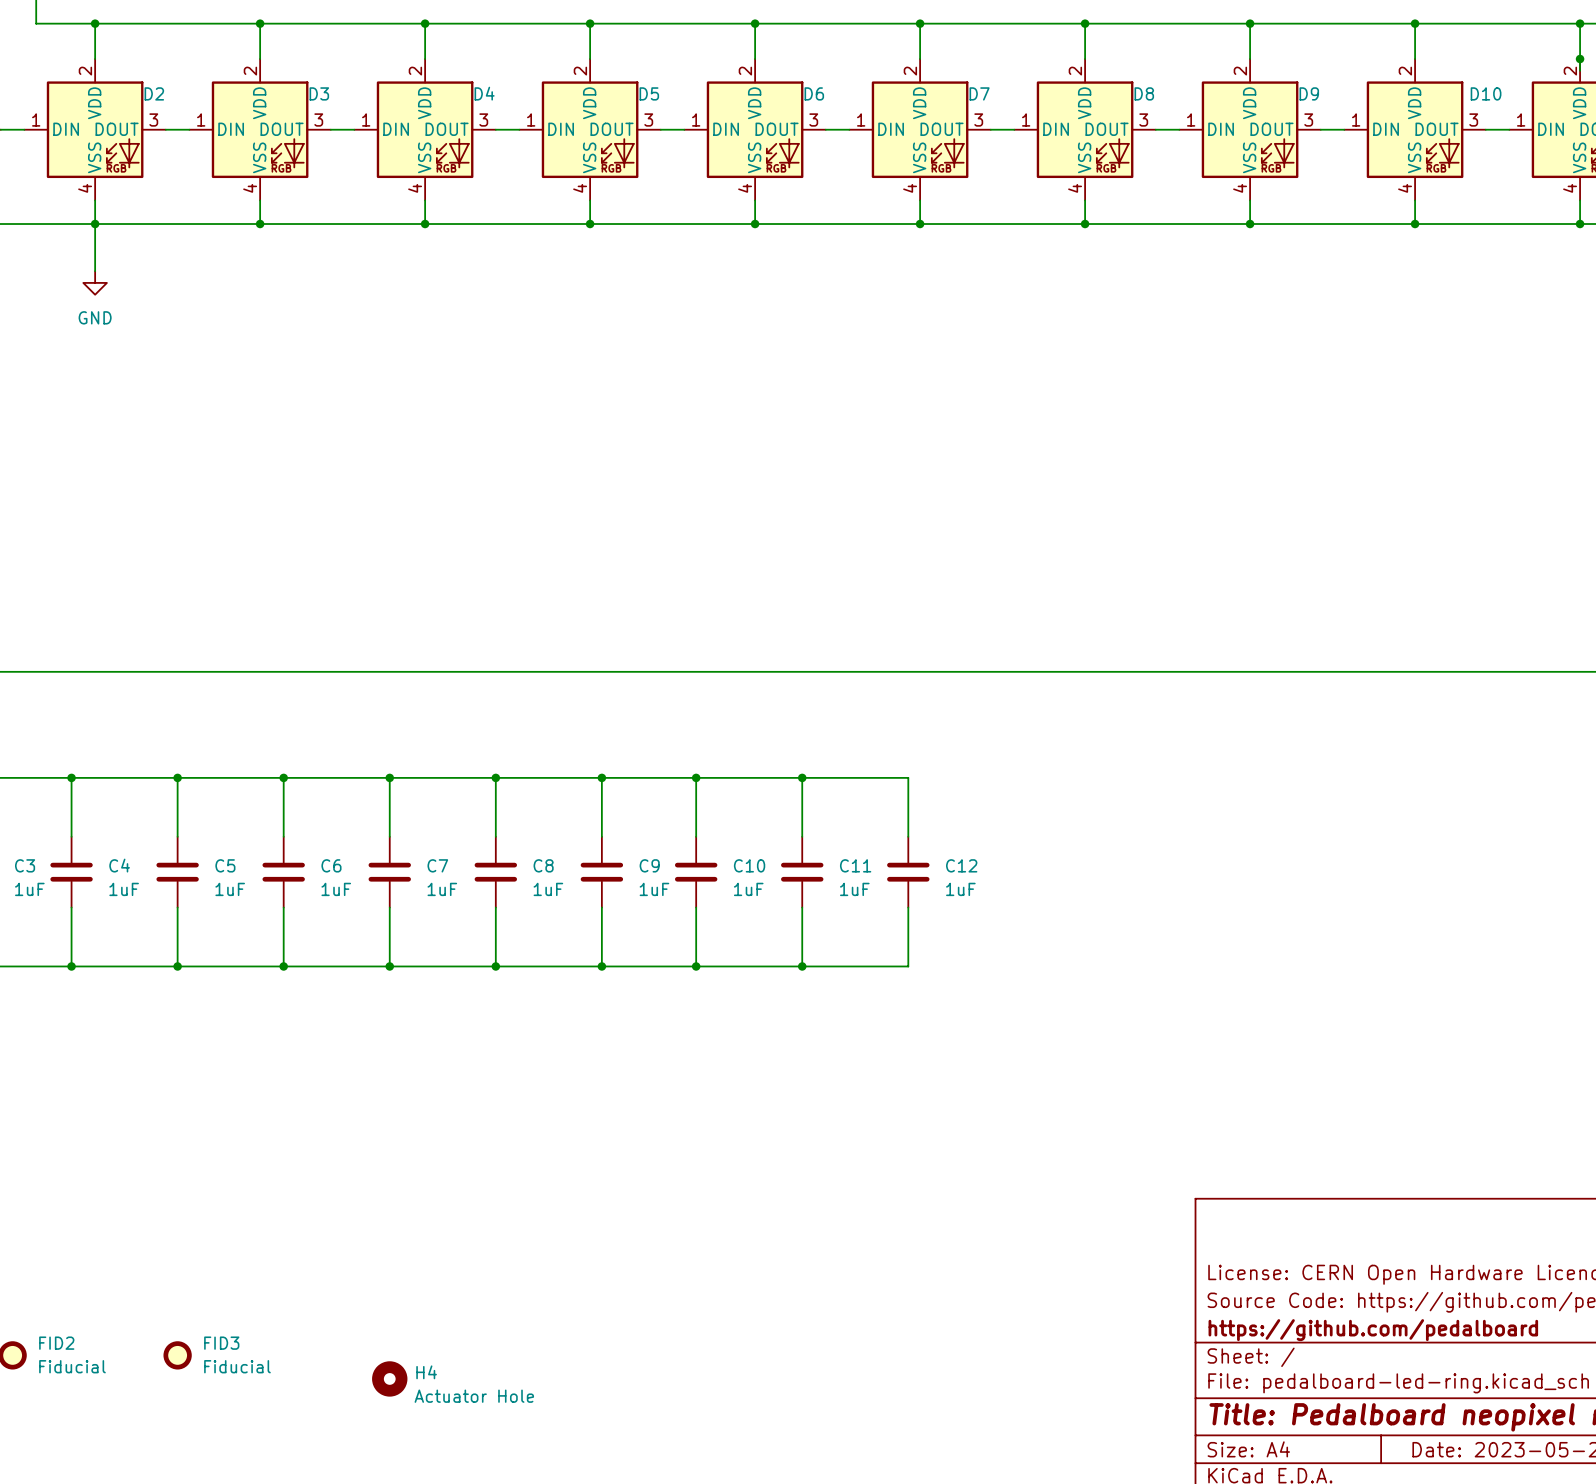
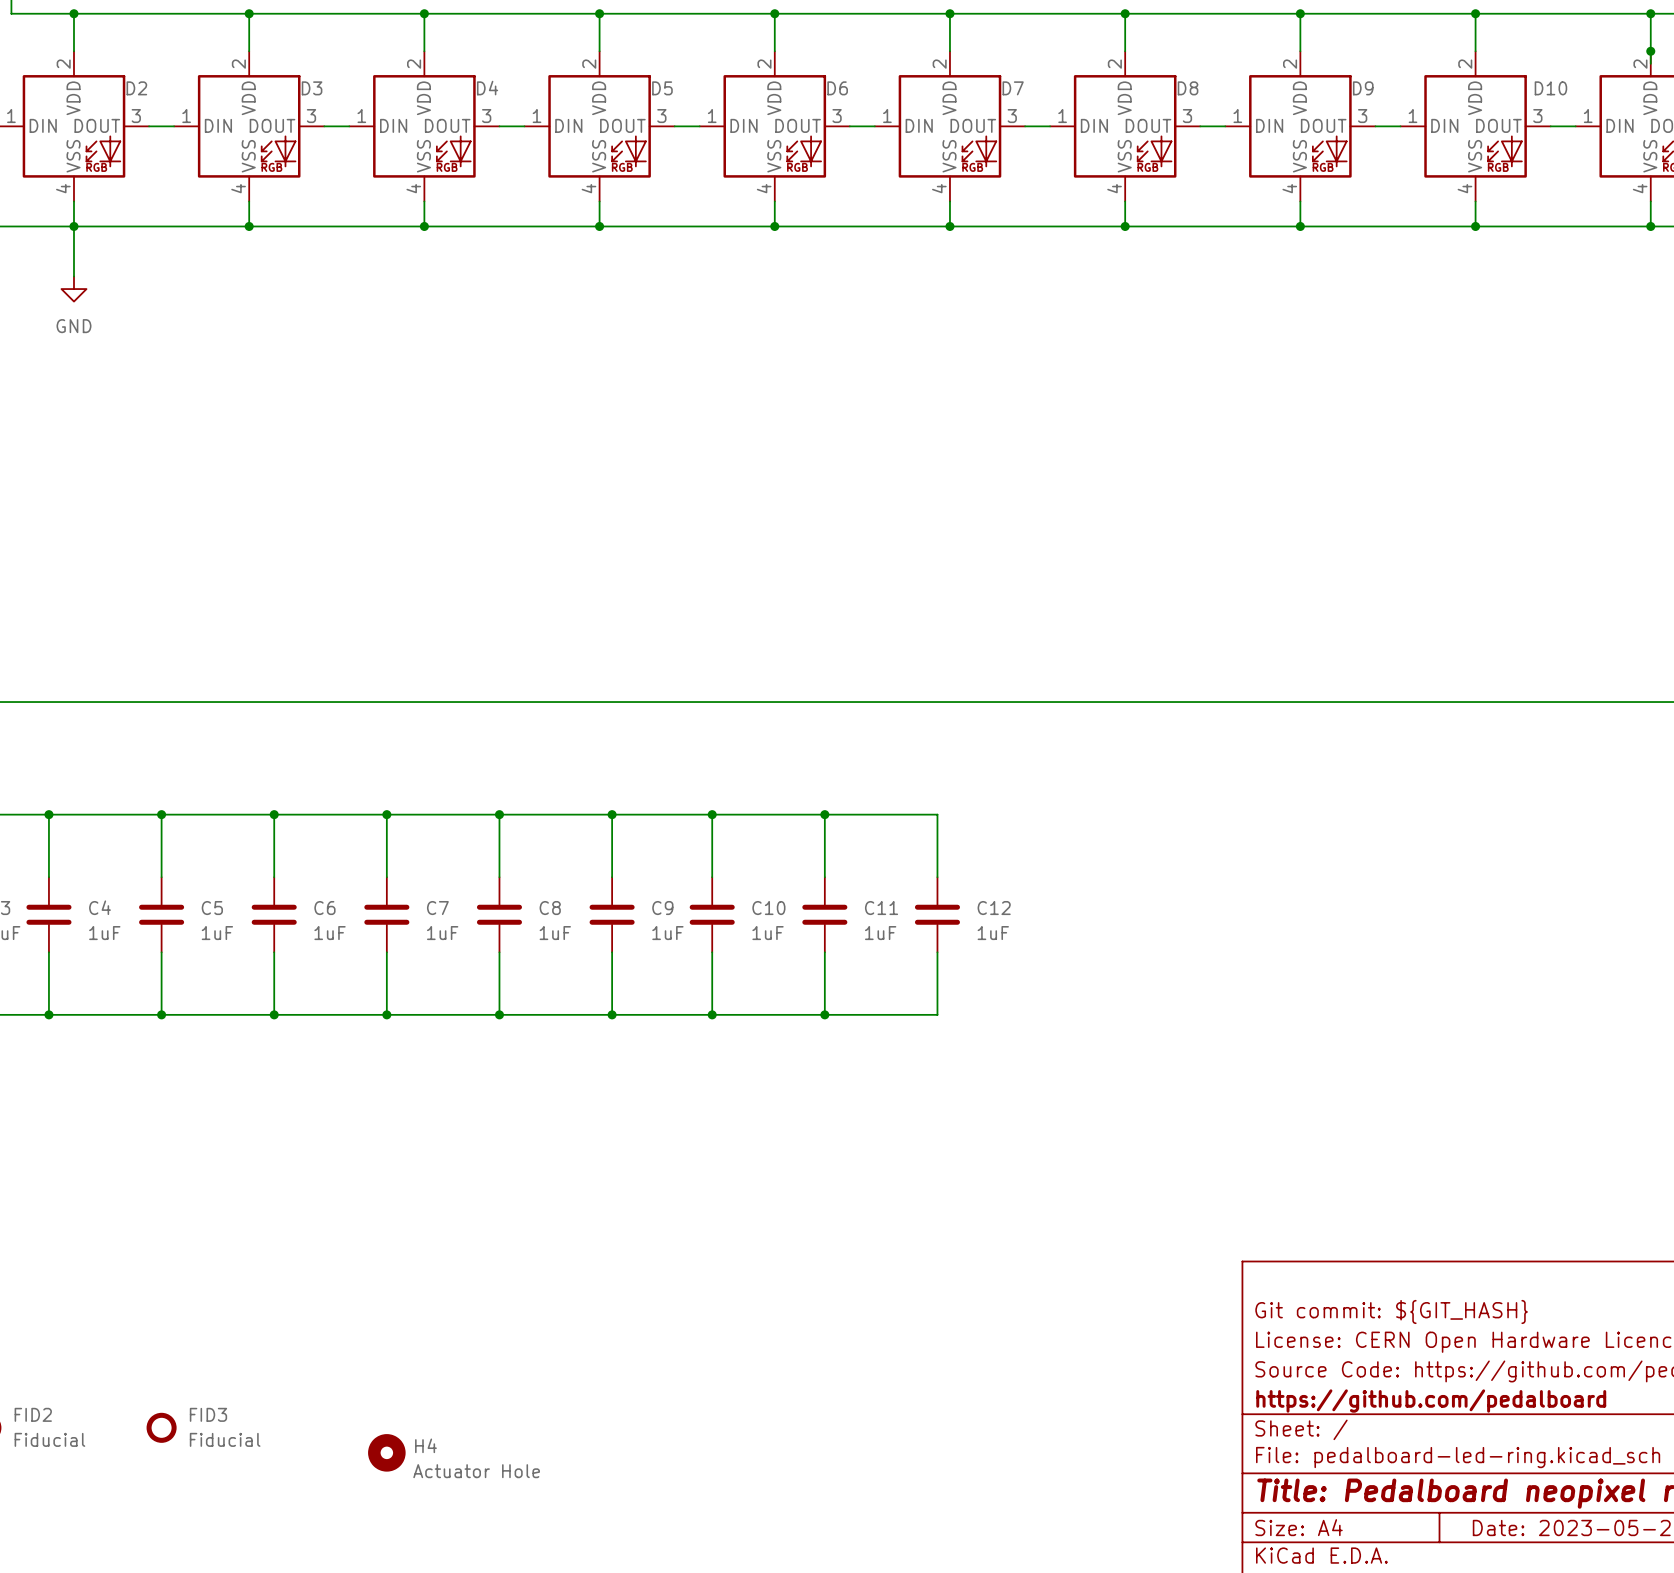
title block: none -> Git commit: ${GIT_HASH} (1391, 1311)

